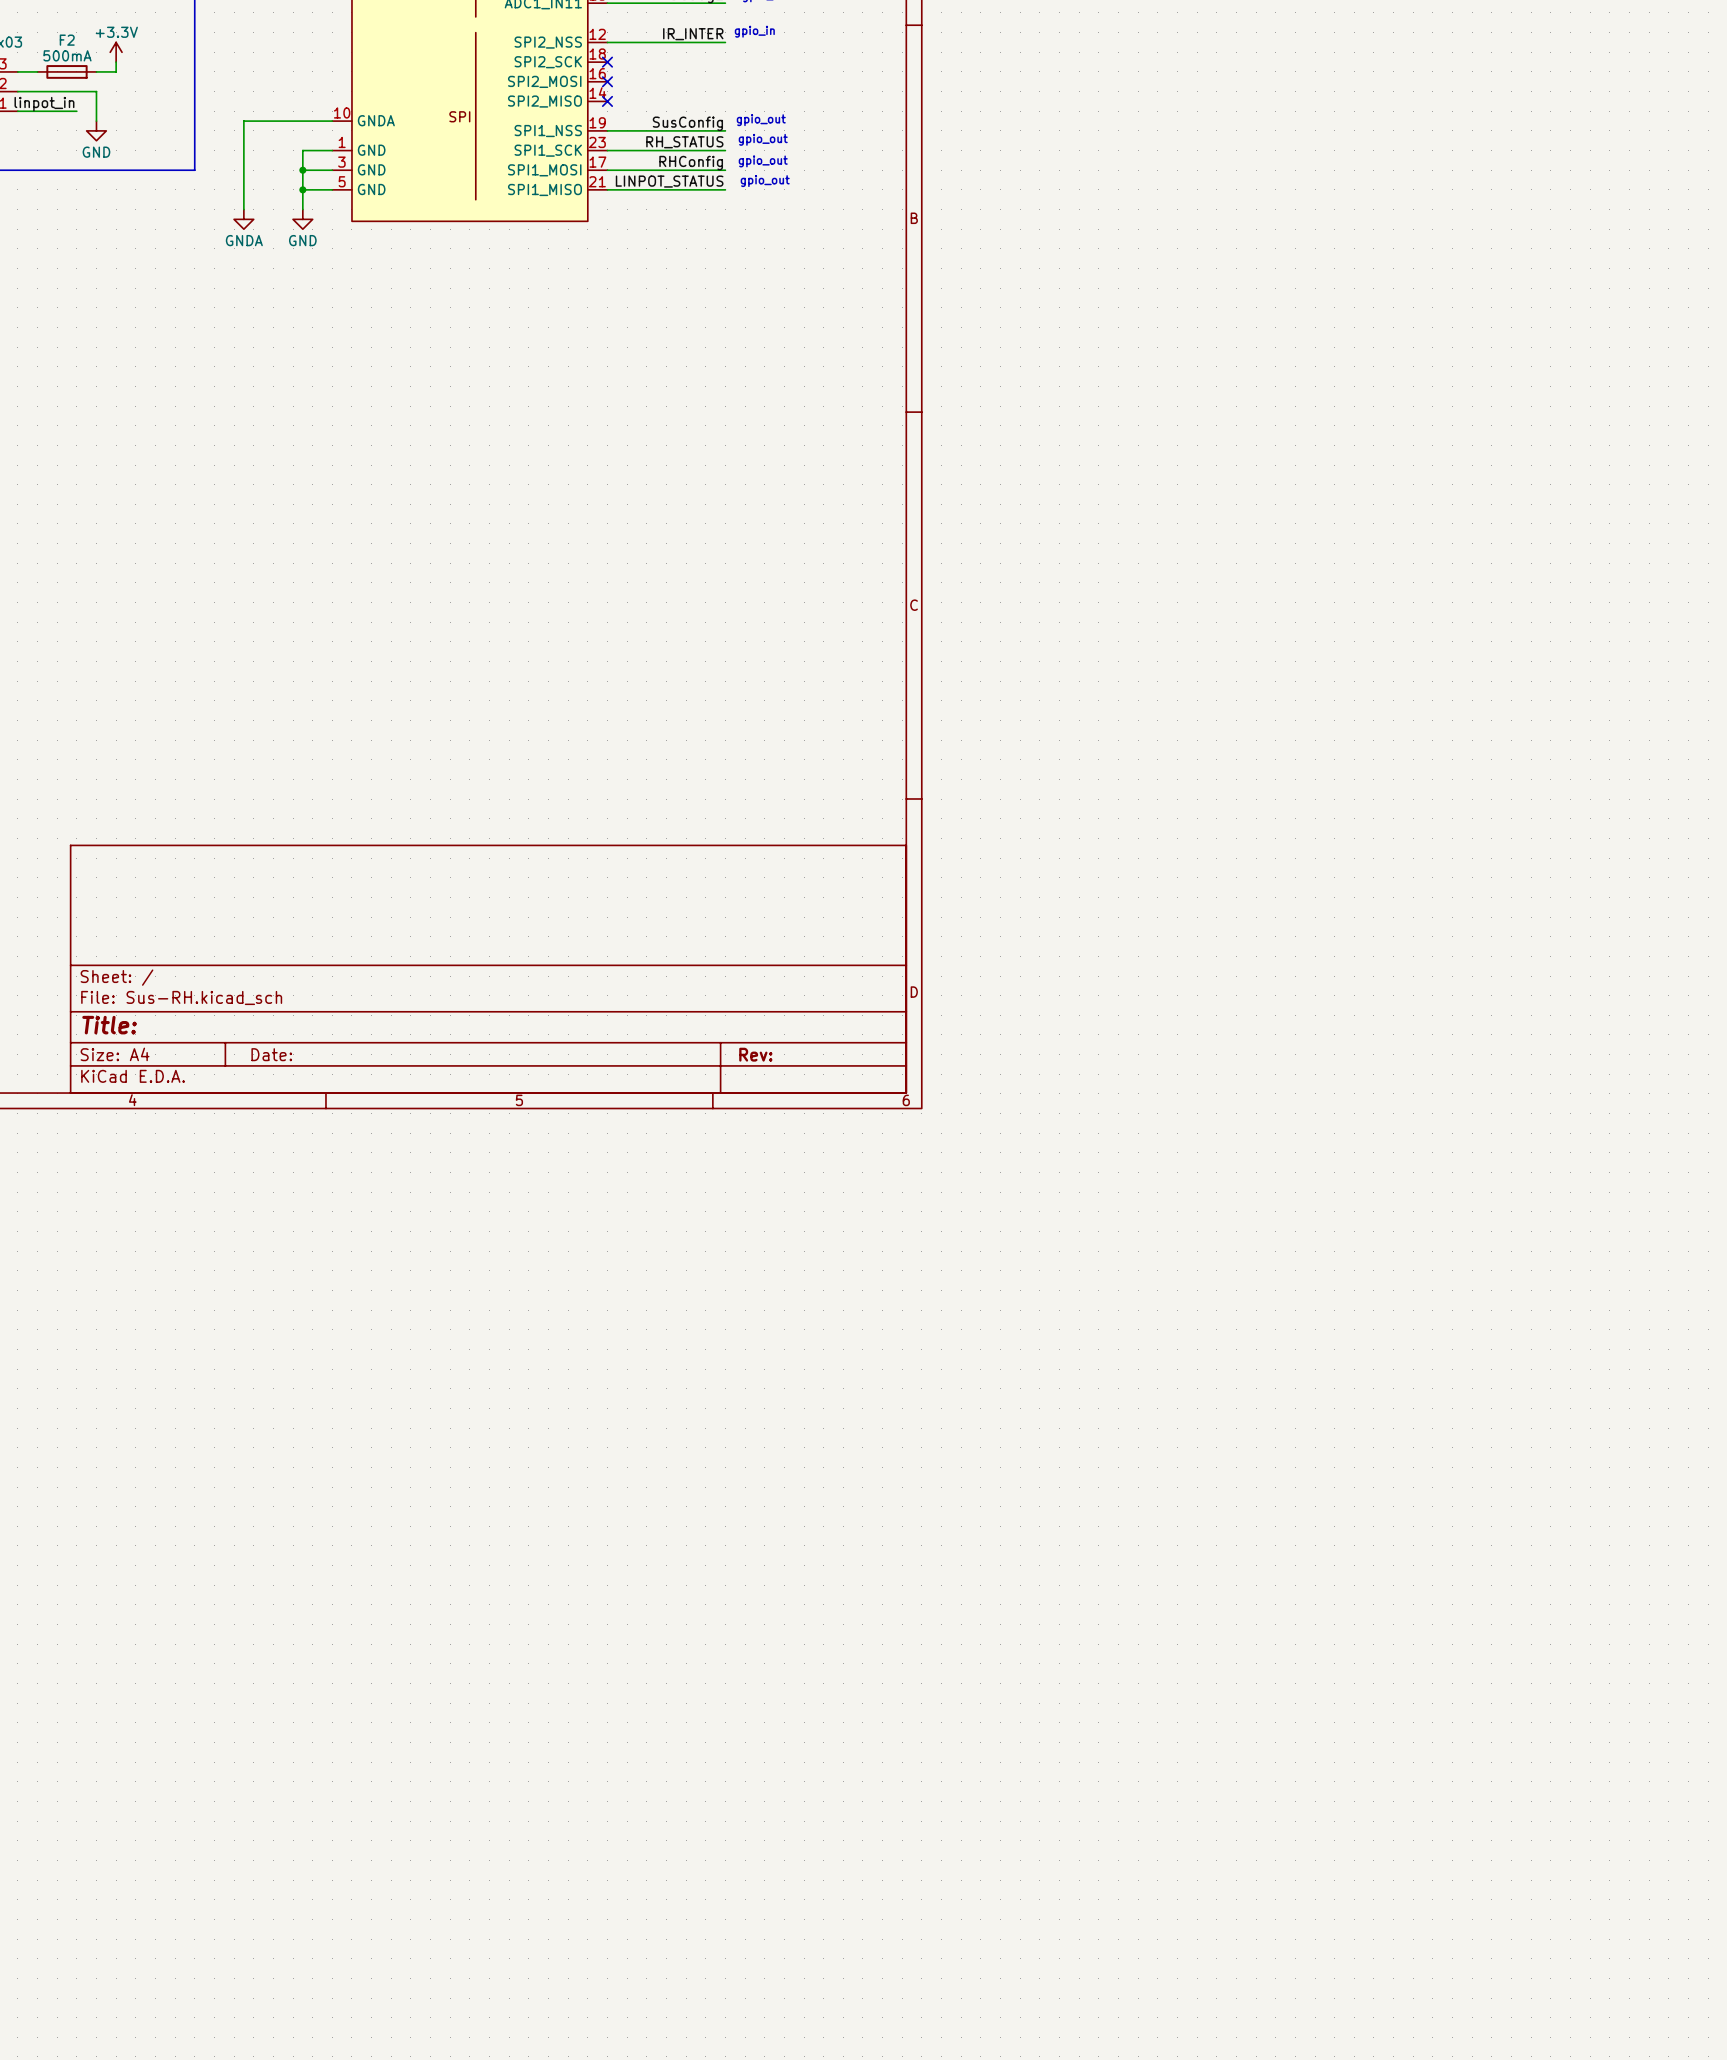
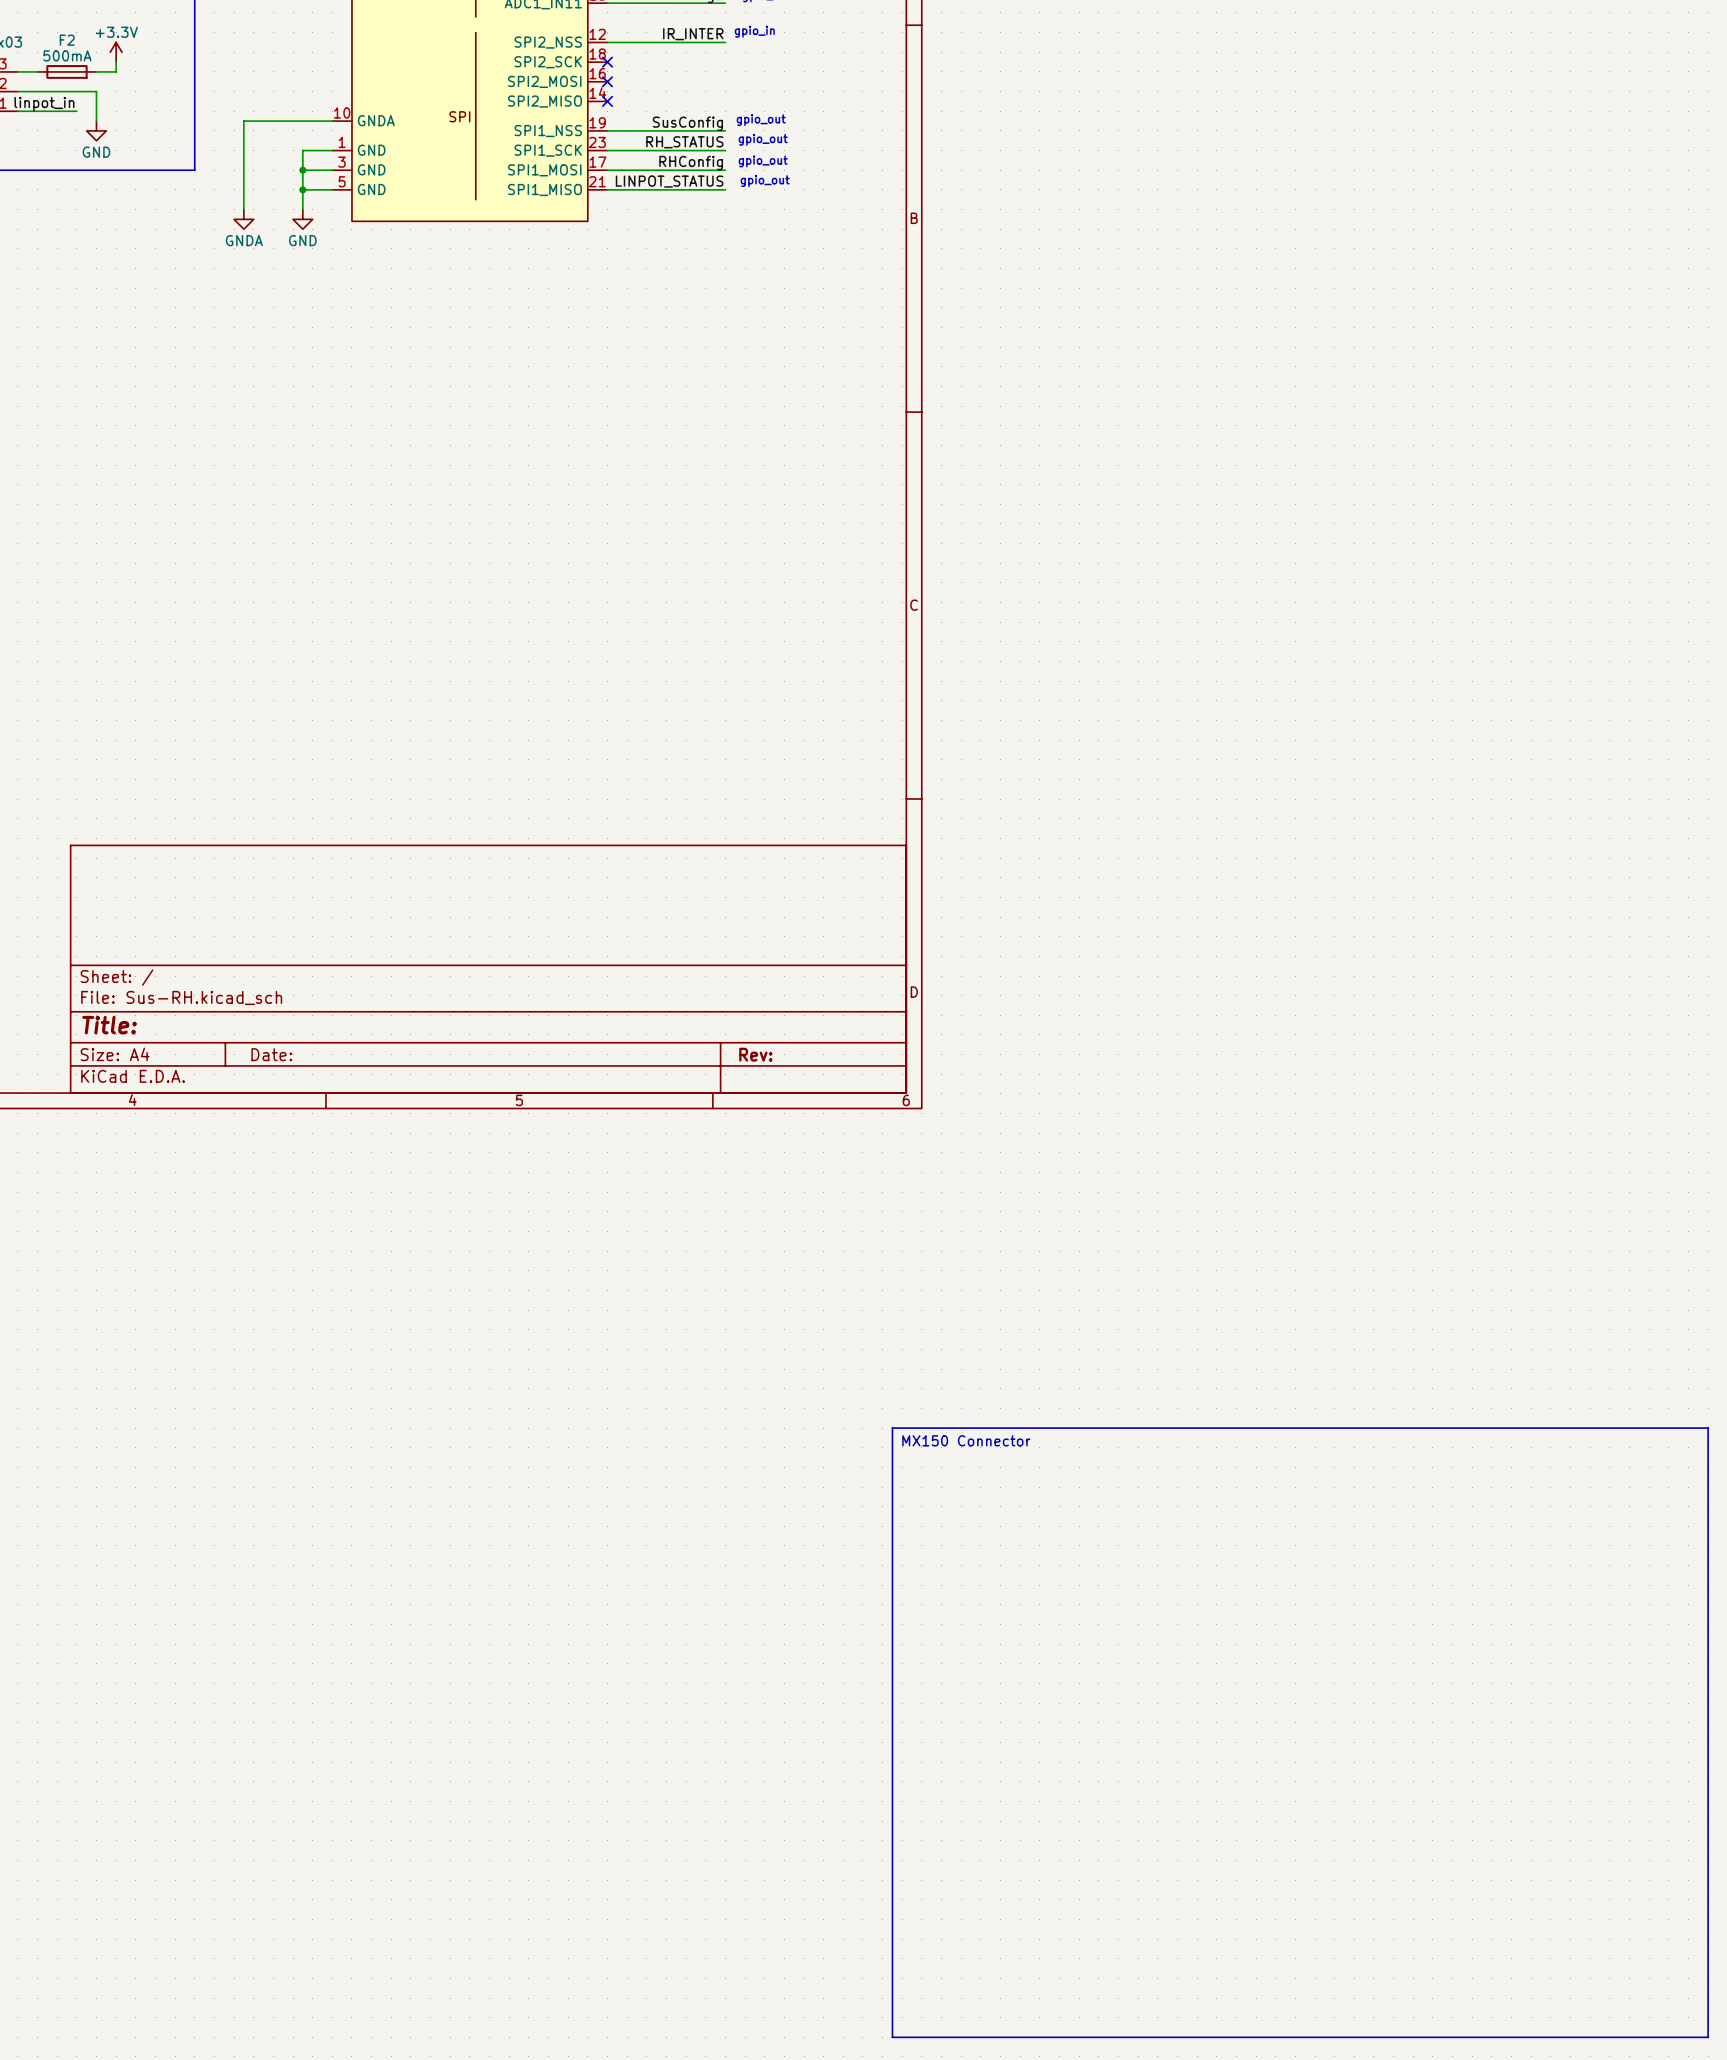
line: none -> (892, 1428) (1708, 1428) (1708, 2037) (892, 2037) (892, 1428)
text: none -> MX150 Connector (966, 1440)

